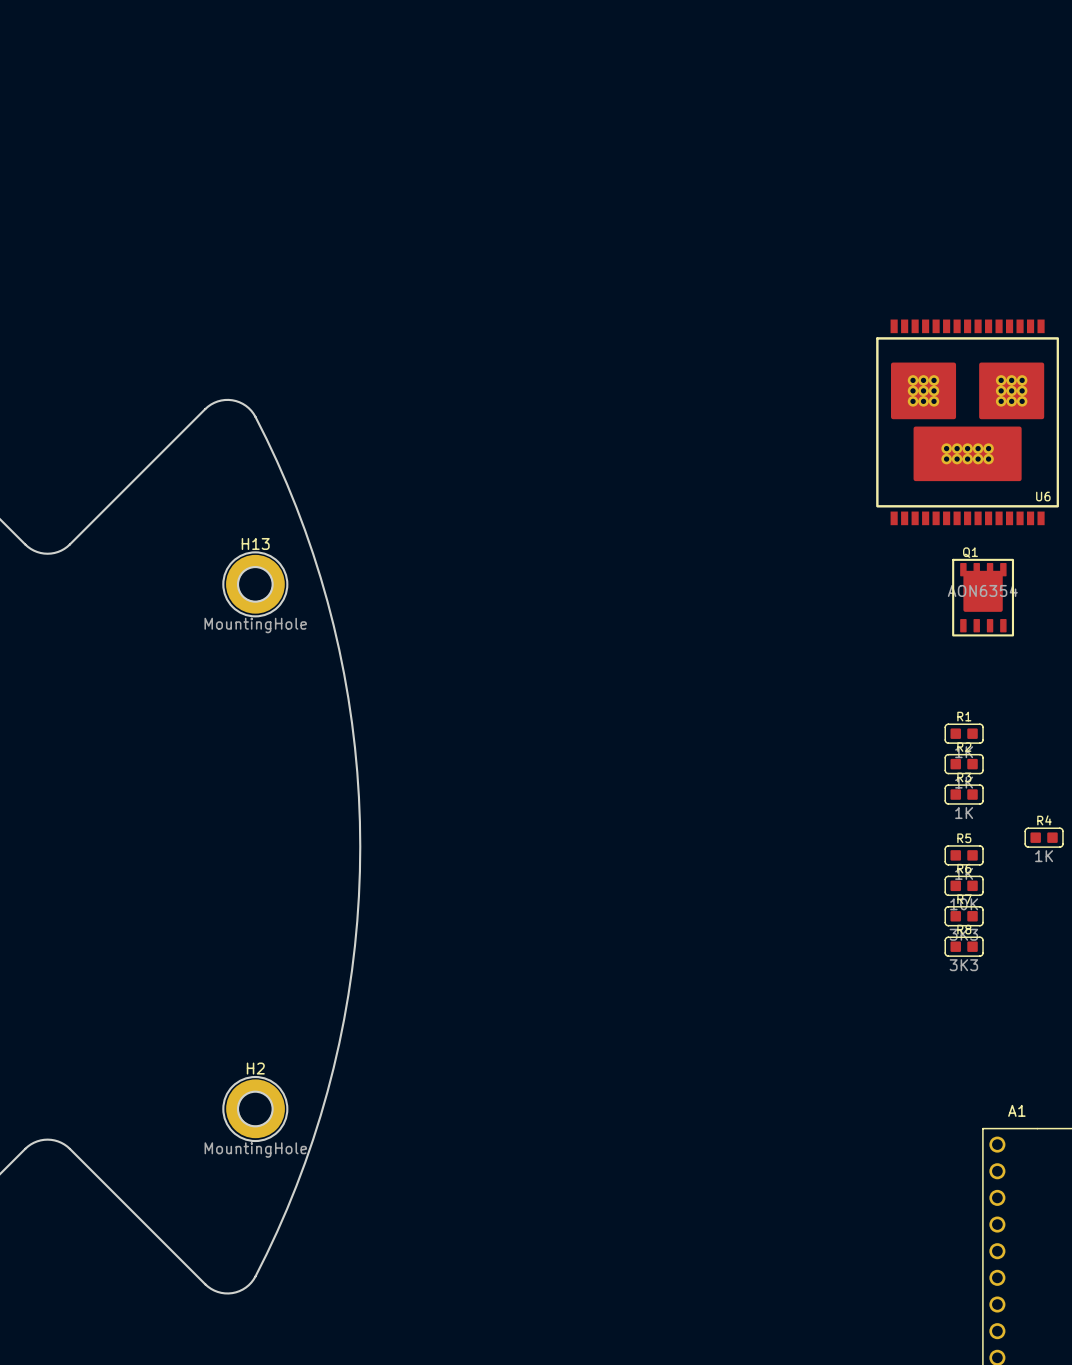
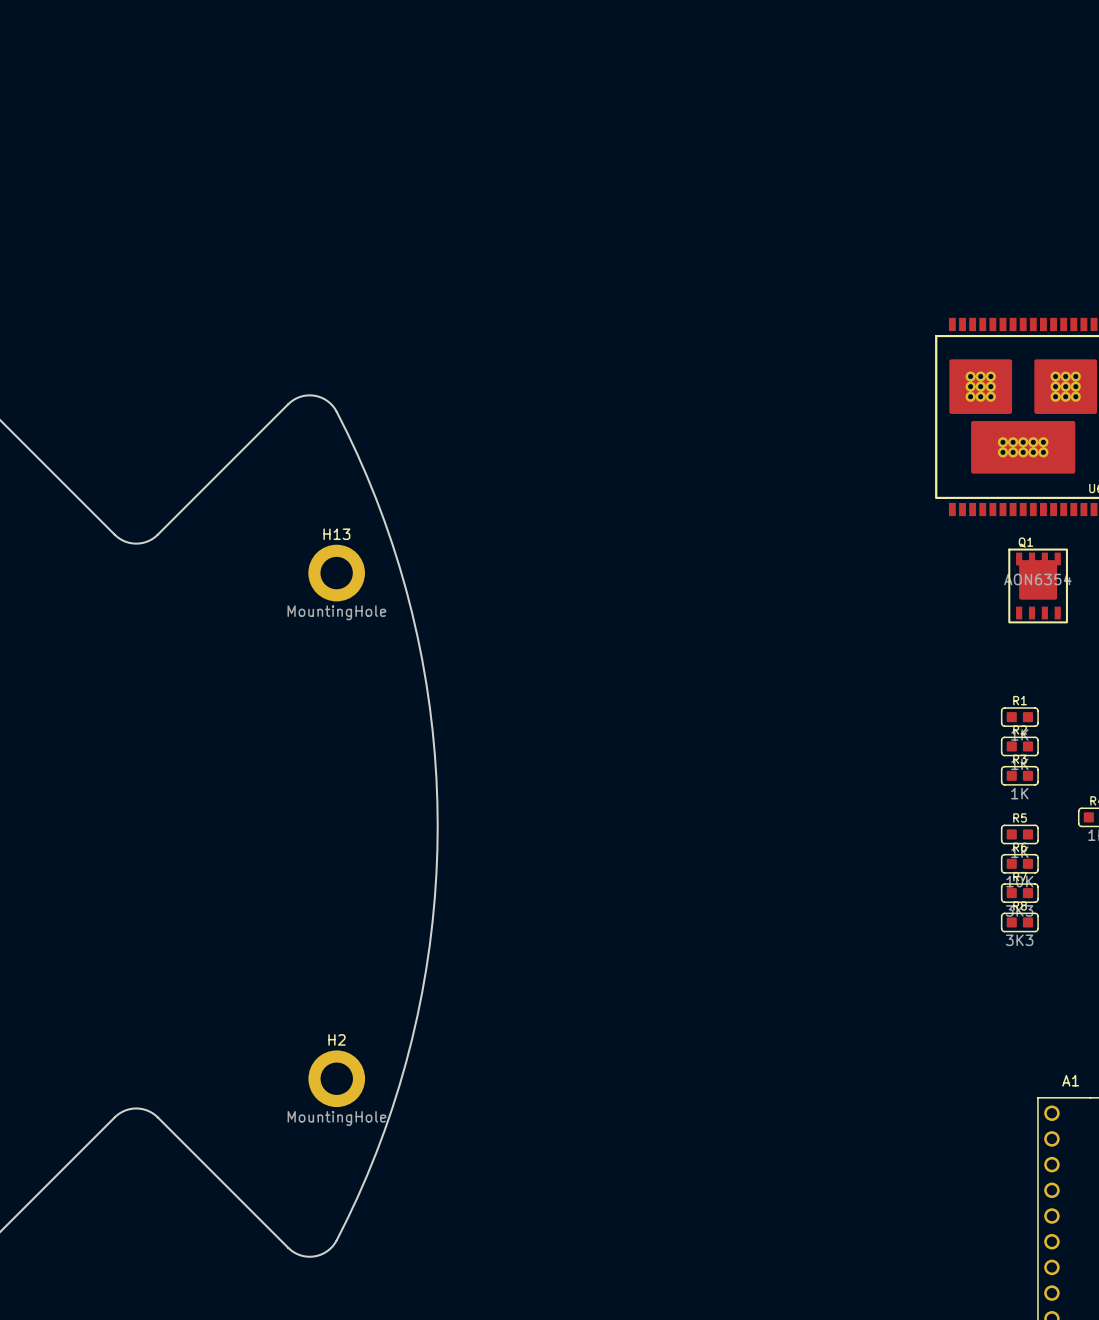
round board edge: [222, 551, 289, 618] -> none
round board edge: [236, 566, 274, 603] -> none
round board edge: [222, 1075, 289, 1143] -> none
round board edge: [236, 1090, 274, 1128] -> none

